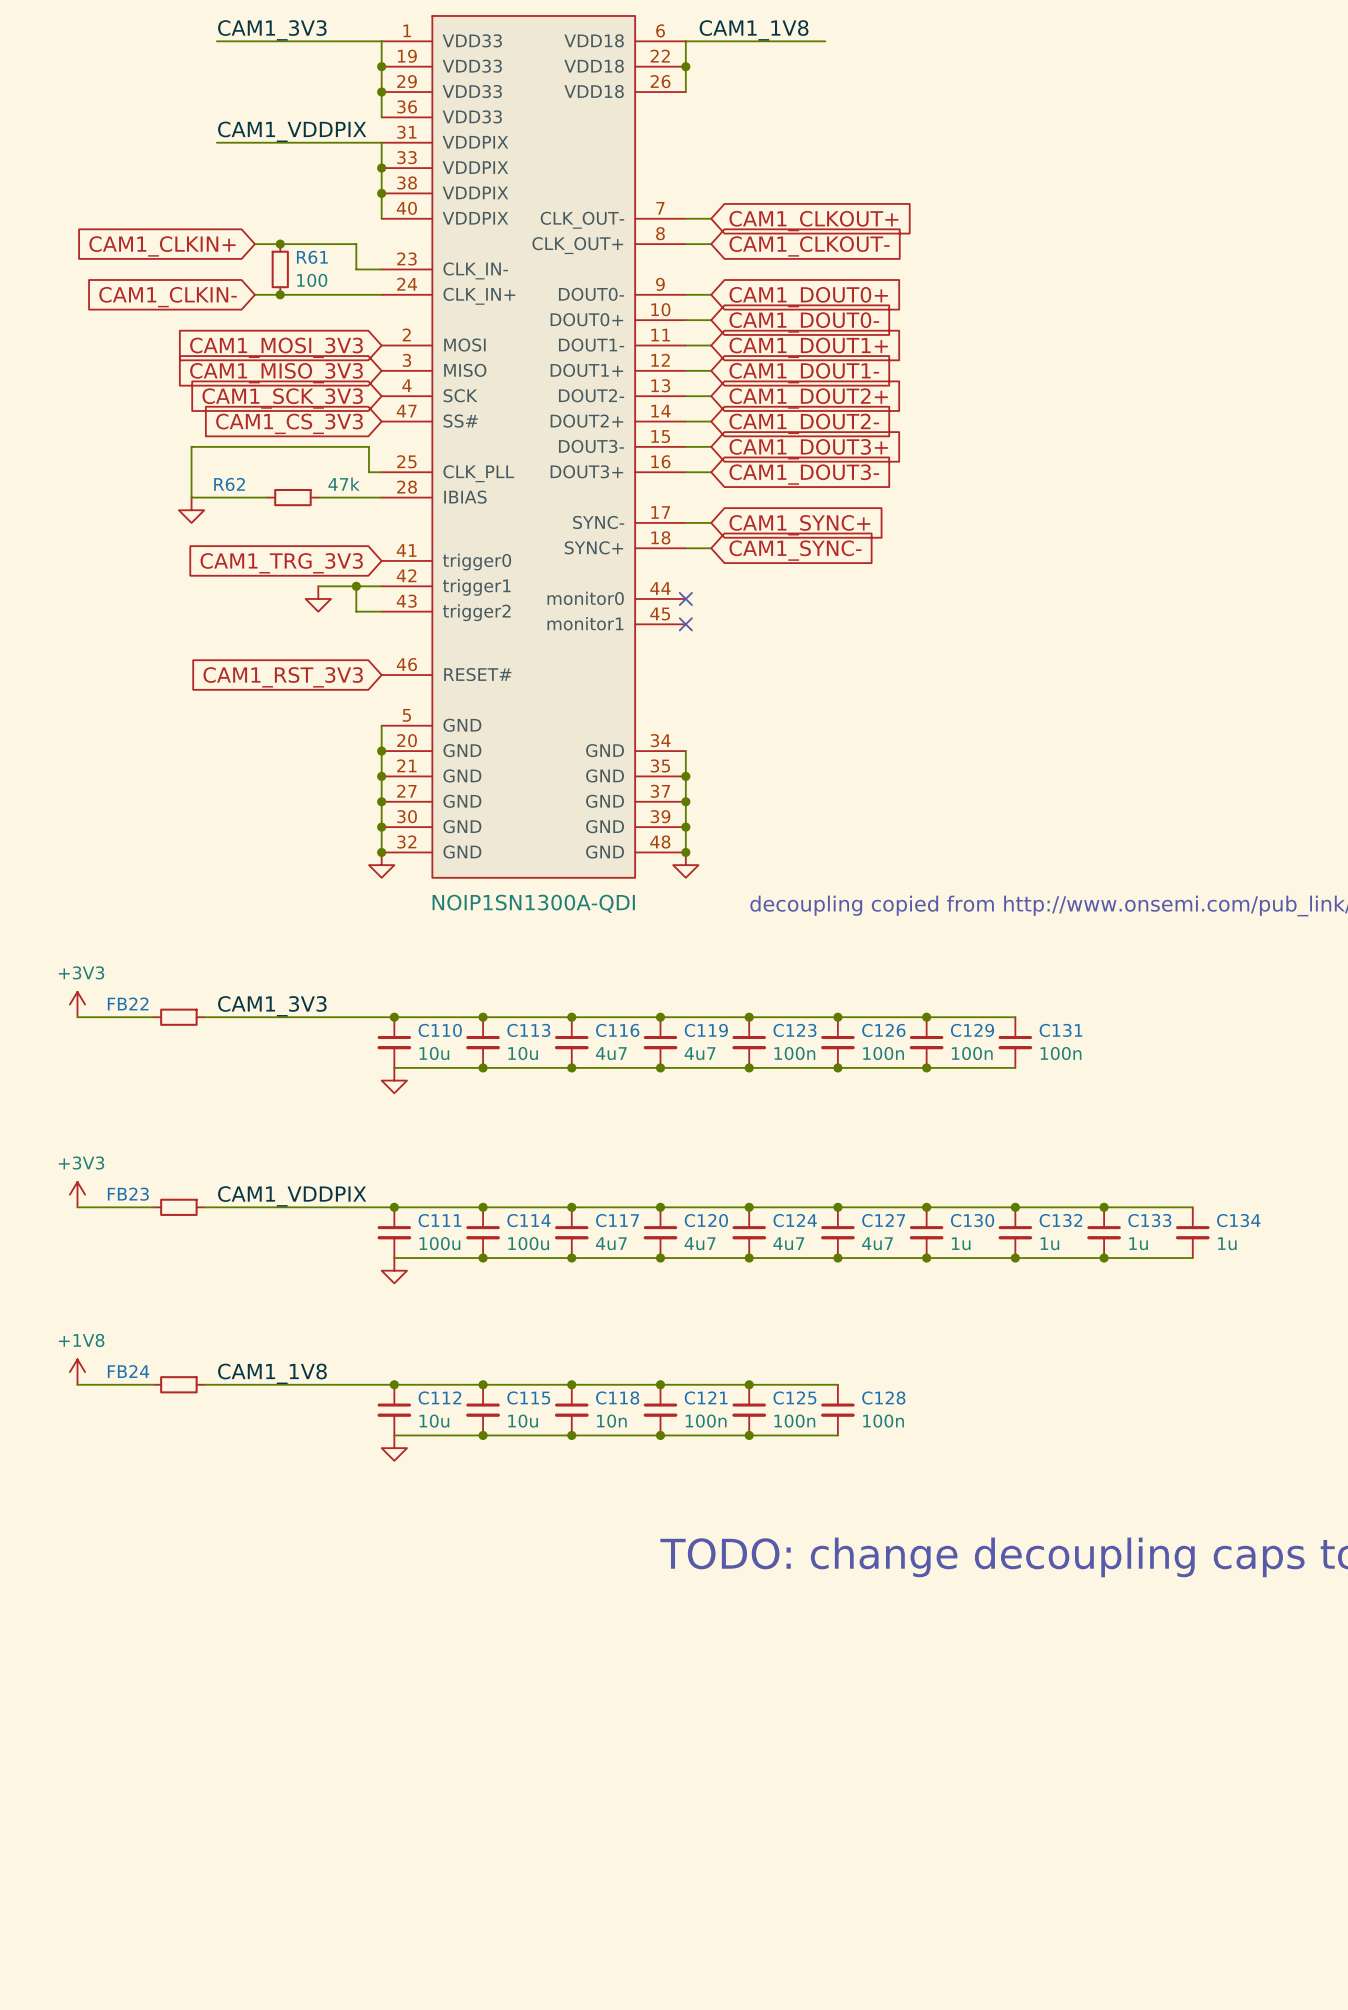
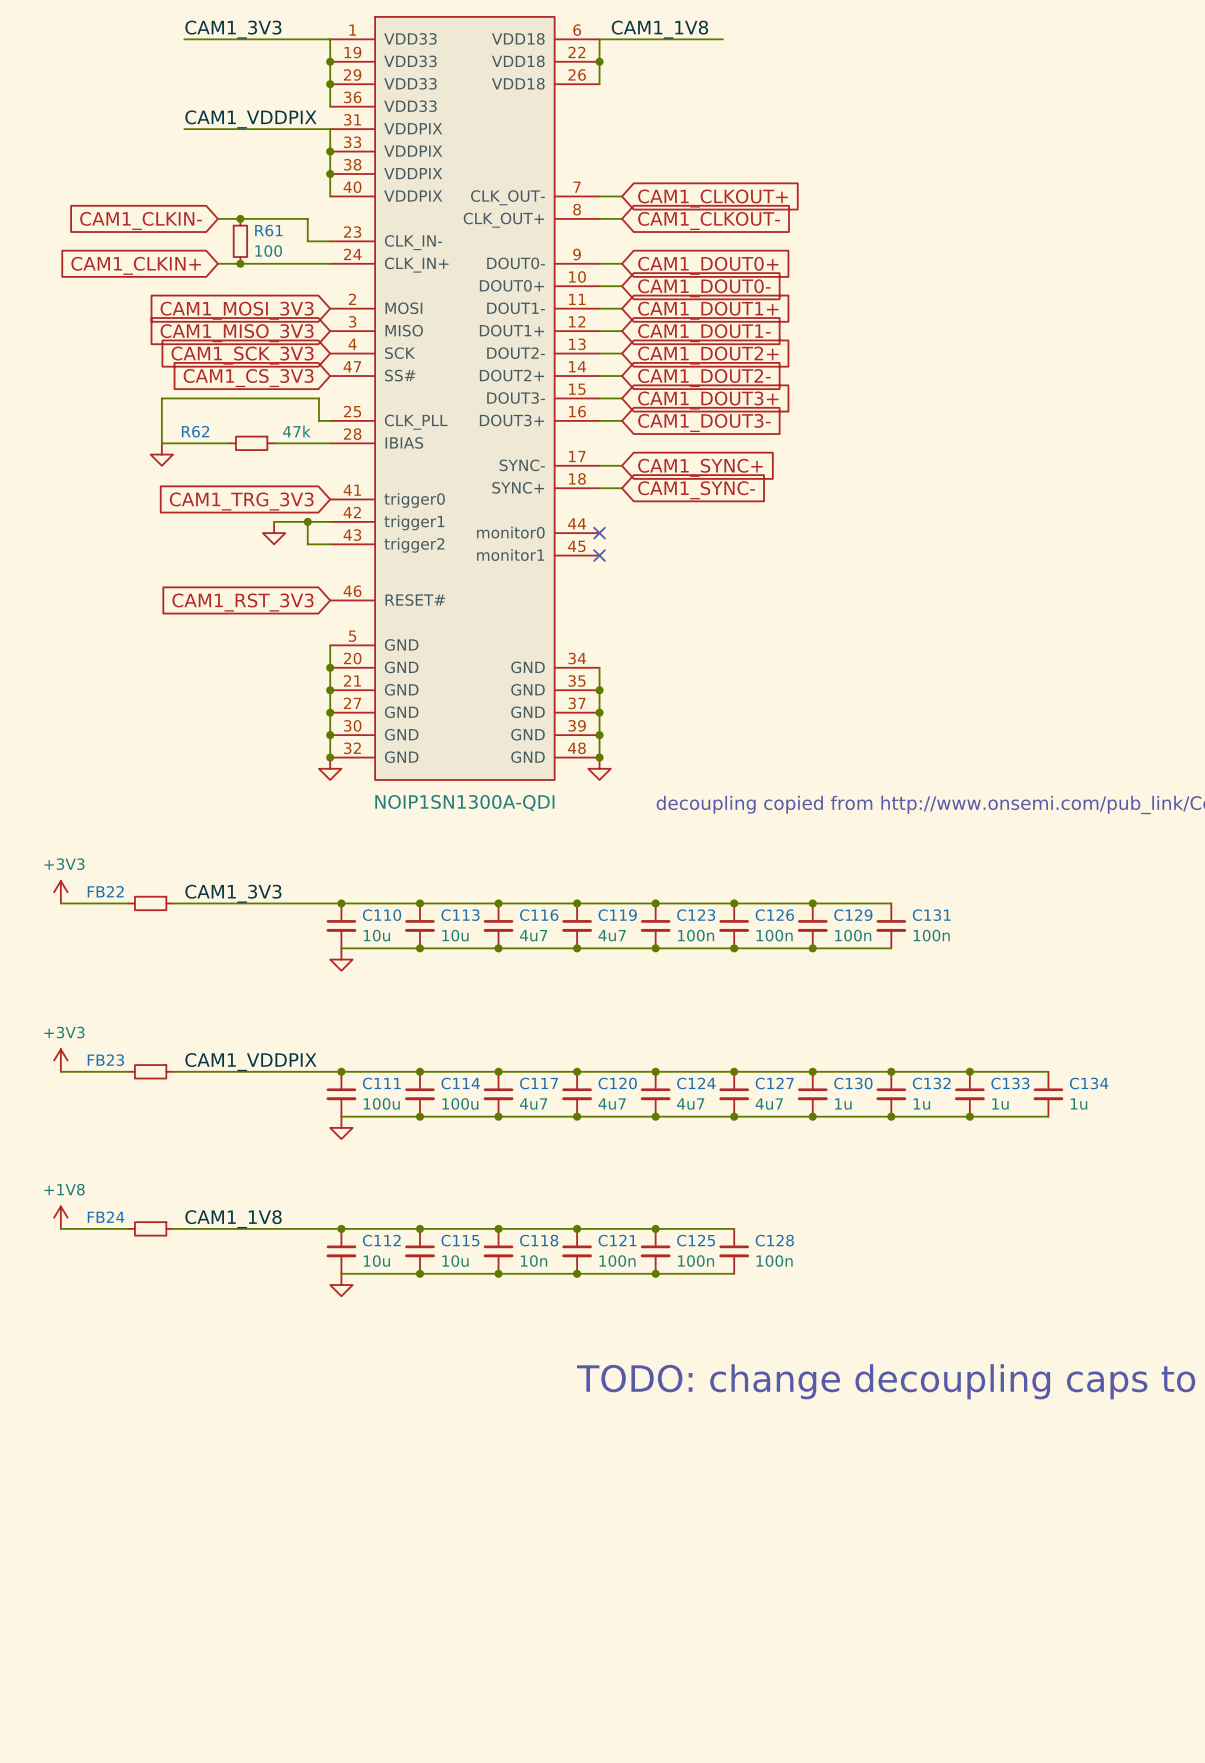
global label: CAM1_CLKIN+ (162, 246) -> CAM1_CLKIN- (141, 220)
global label: CAM1_CLKIN- (168, 297) -> CAM1_CLKIN+ (136, 265)

